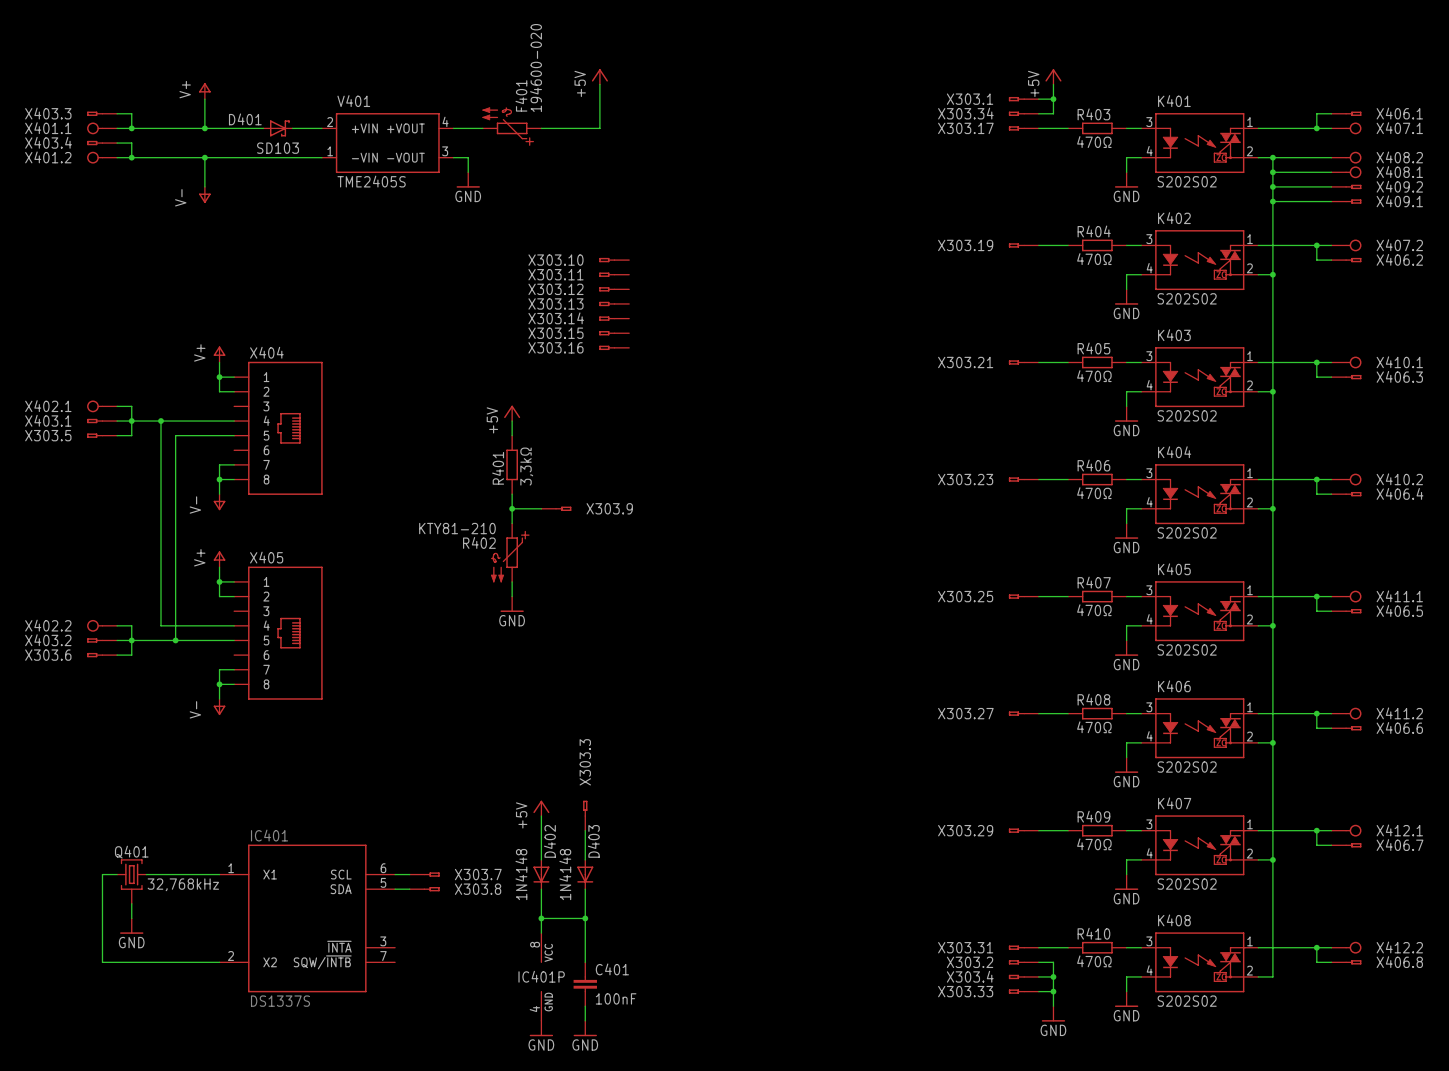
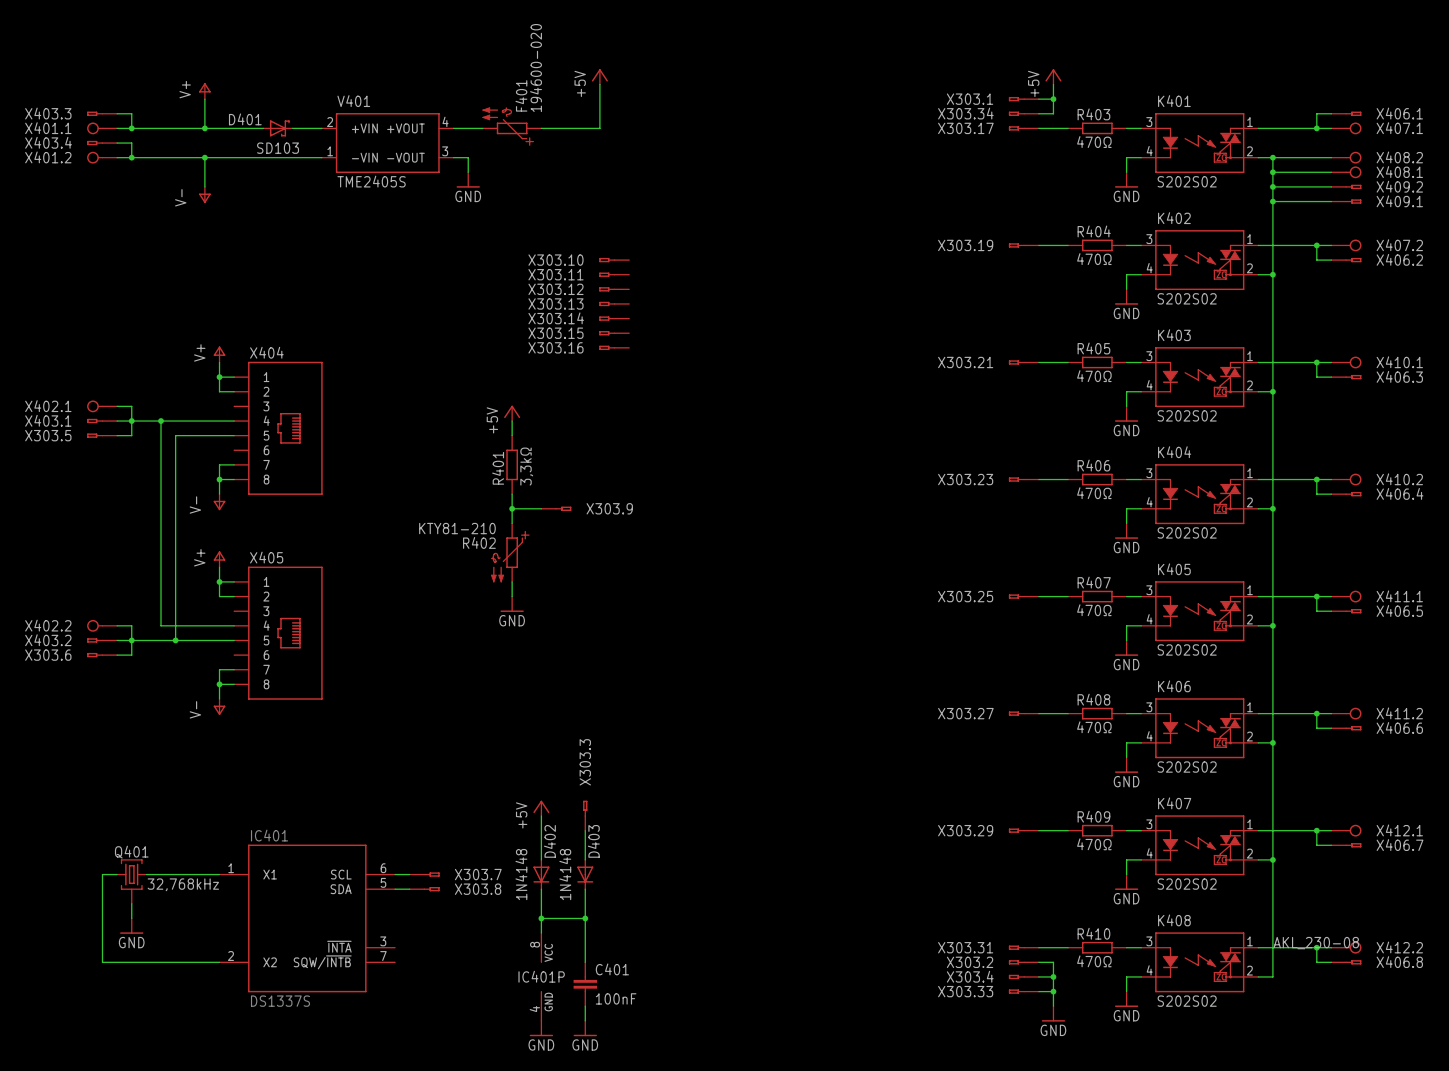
X406.8 value: none -> AKL_230-08 (1316, 943)

